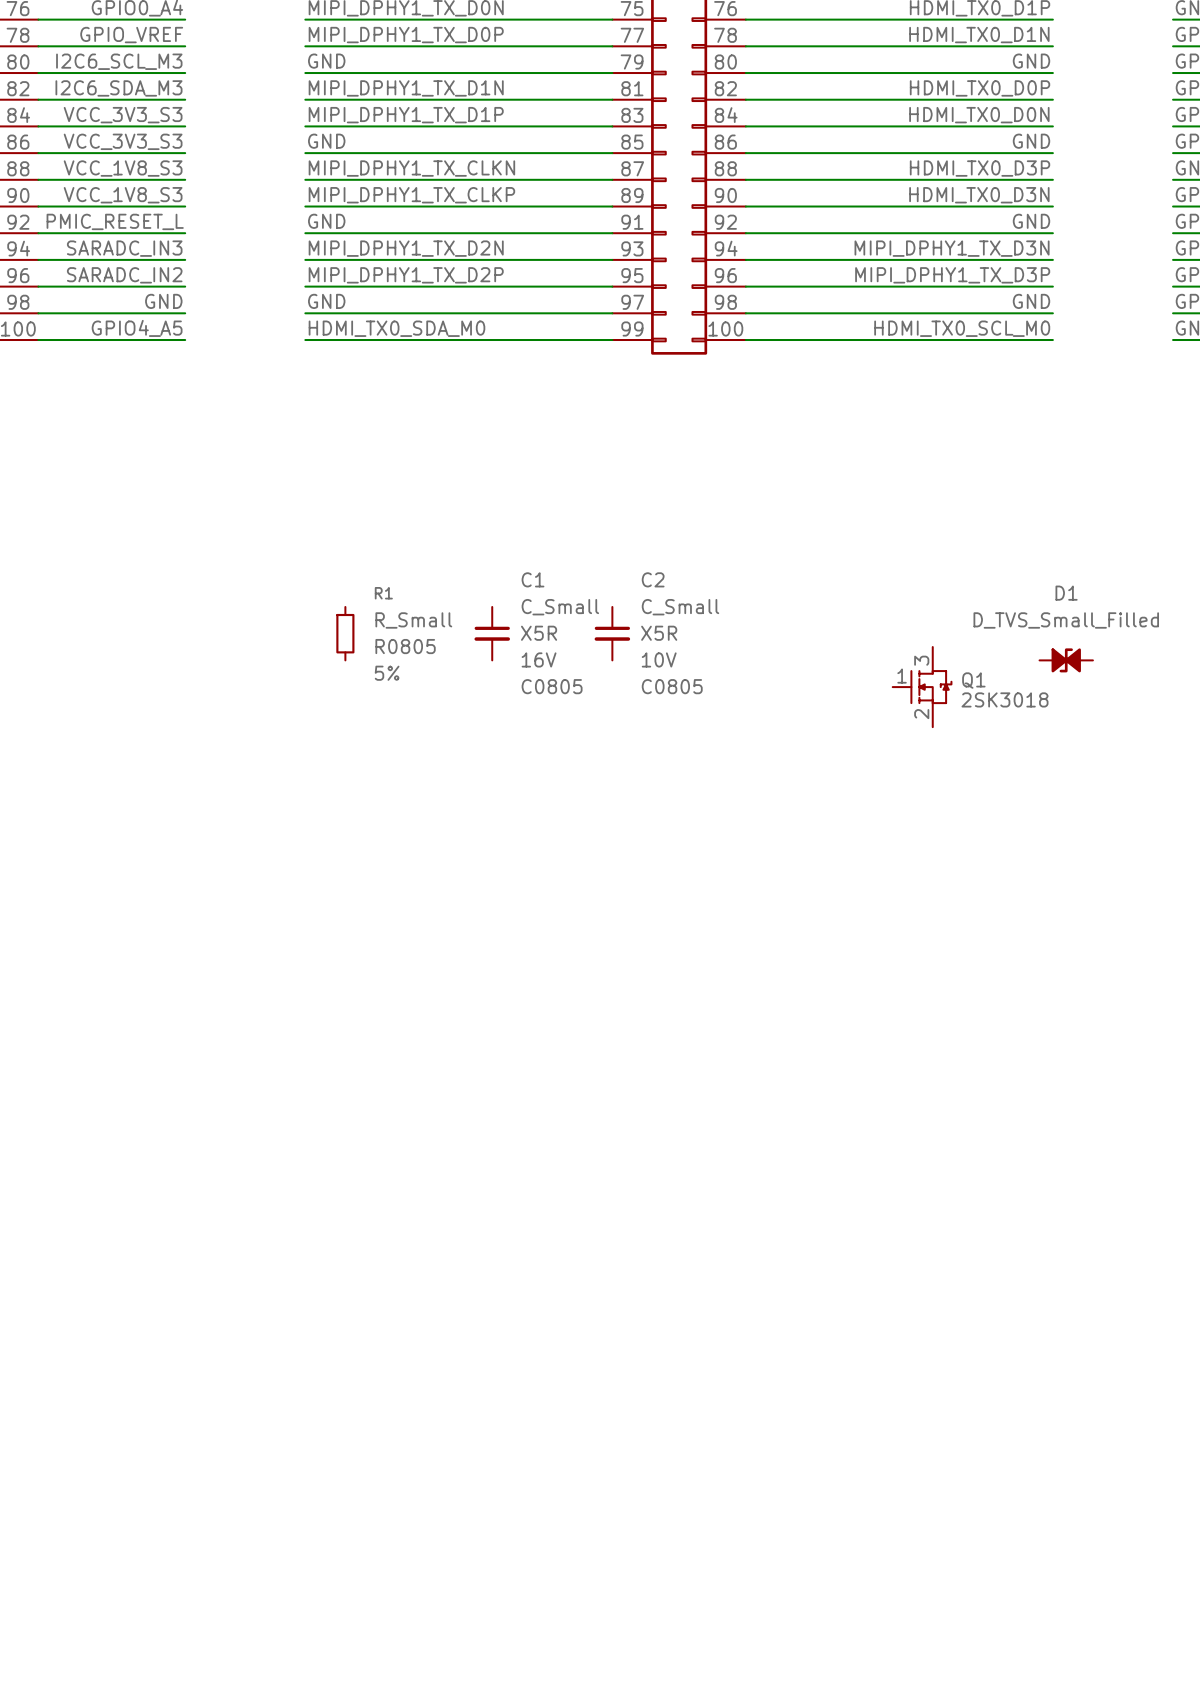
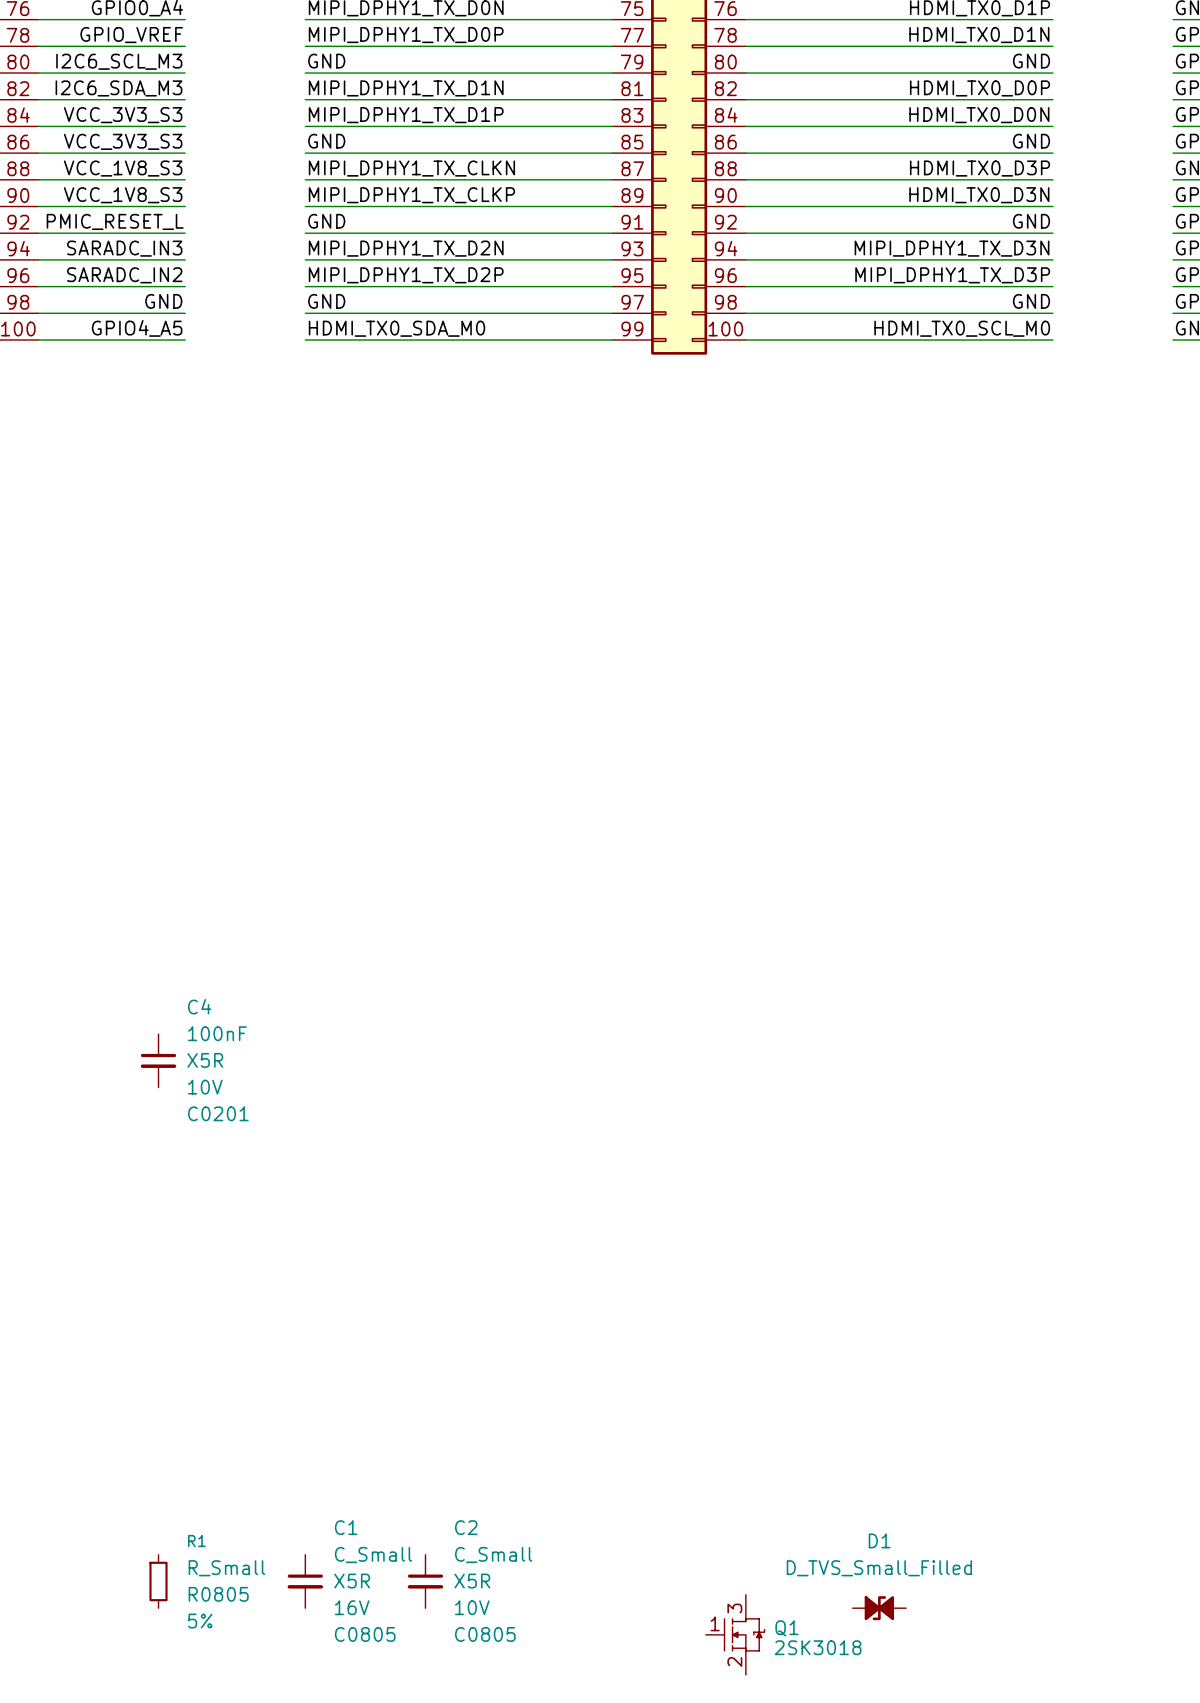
R1 position: (345, 633) -> (158, 1581)
C1 position: (492, 633) -> (305, 1581)
C2 position: (612, 633) -> (425, 1581)
D1 position: (1066, 660) -> (879, 1608)
Q1 position: (922, 687) -> (735, 1634)
C4: none -> 100nF (158, 1060)

